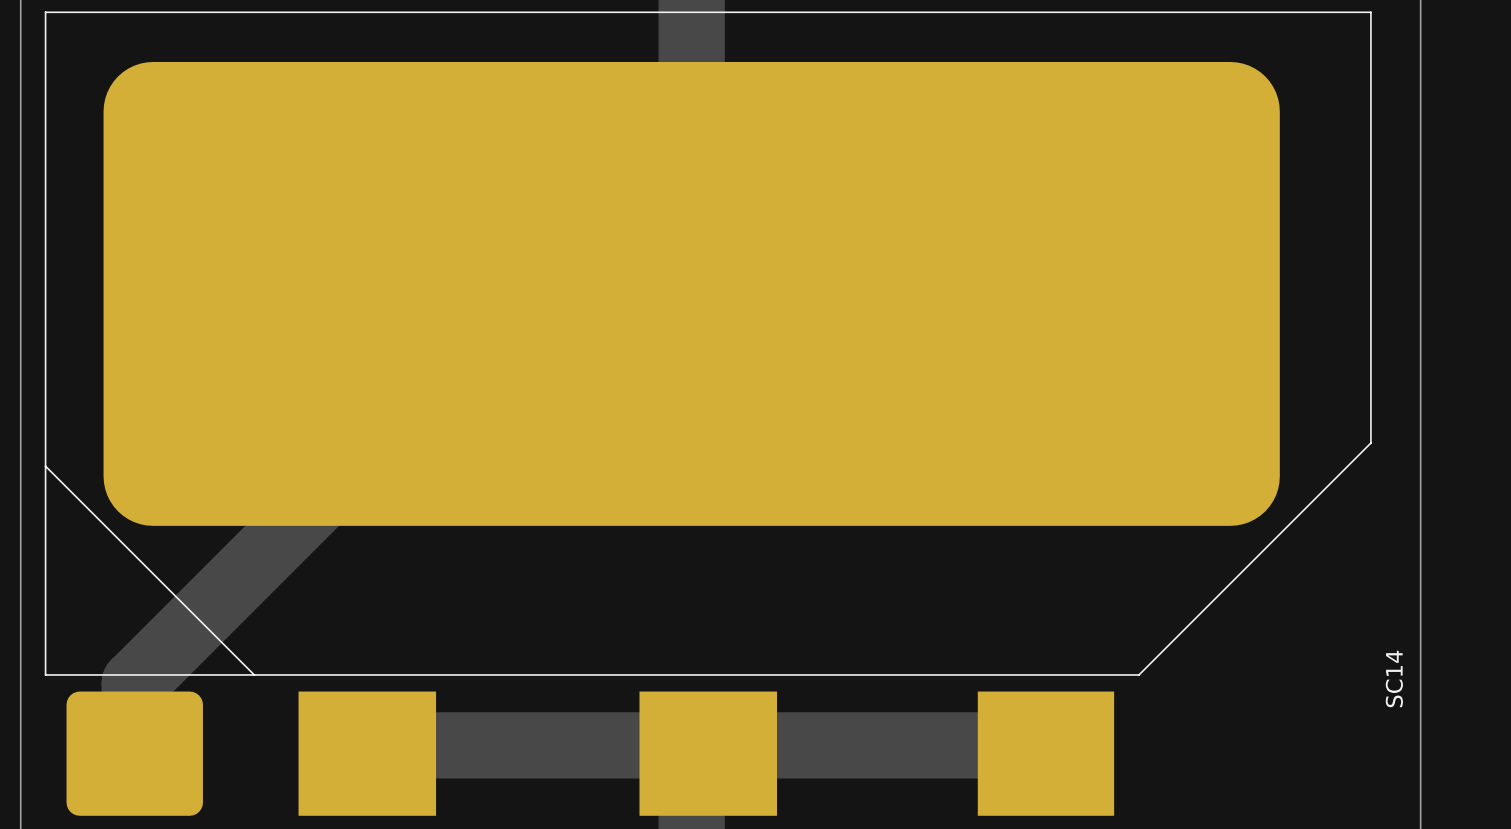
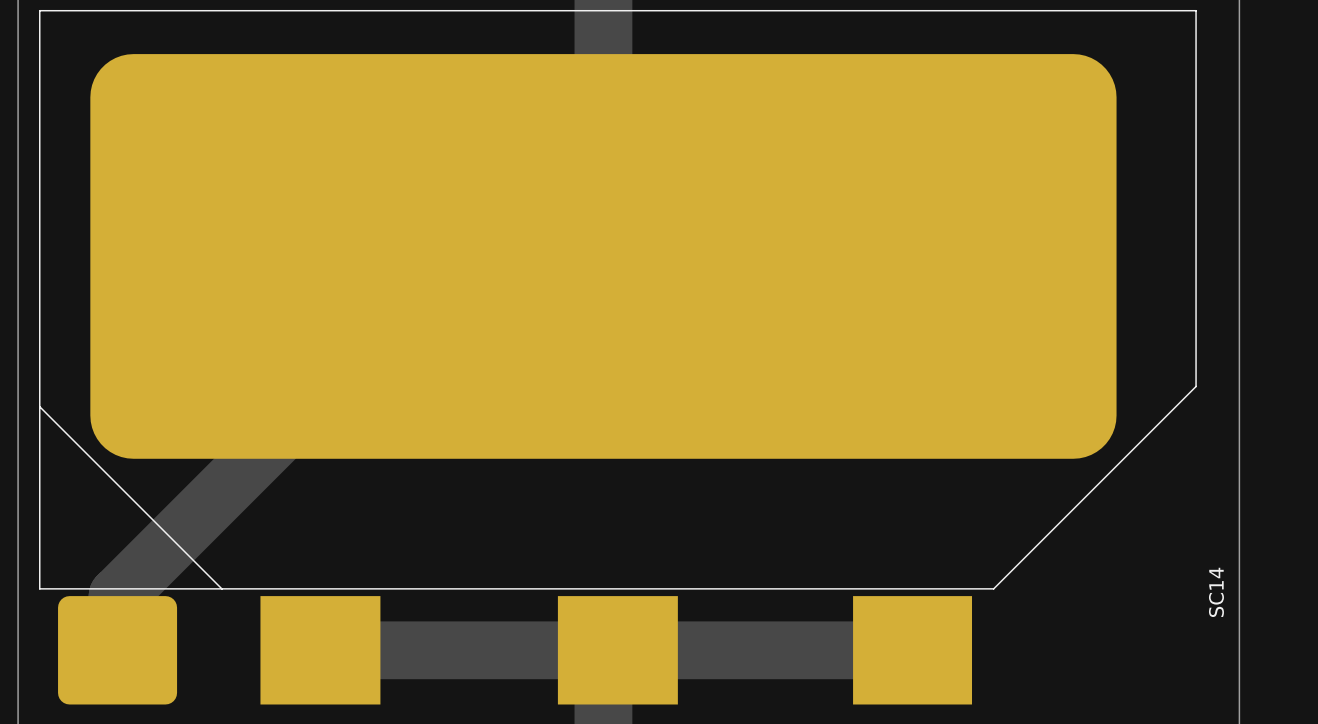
SC14 footprint: [44, 11, 1372, 816] -> [39, 9, 1197, 705]

